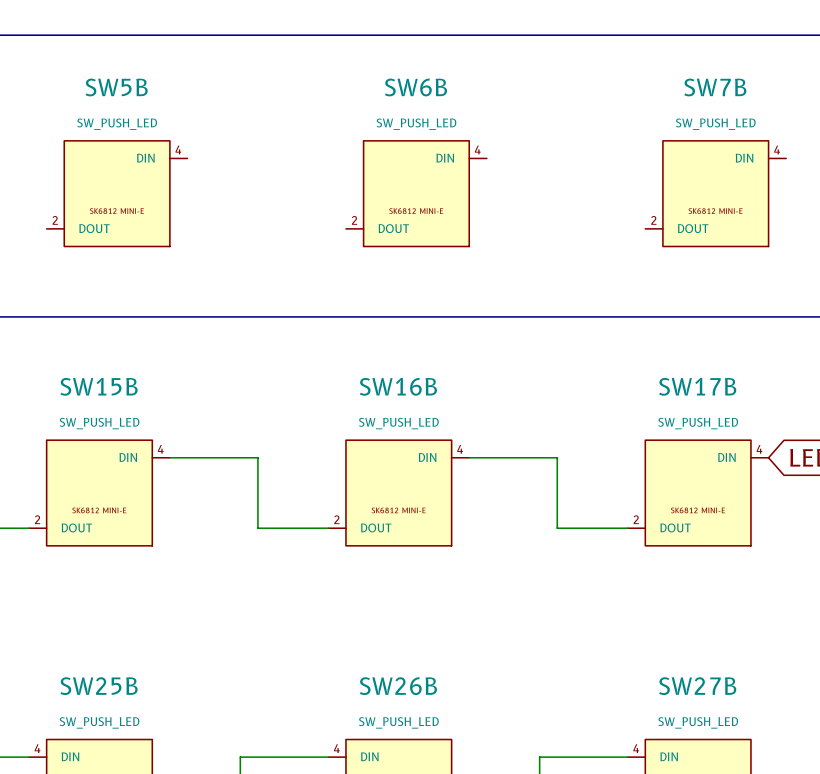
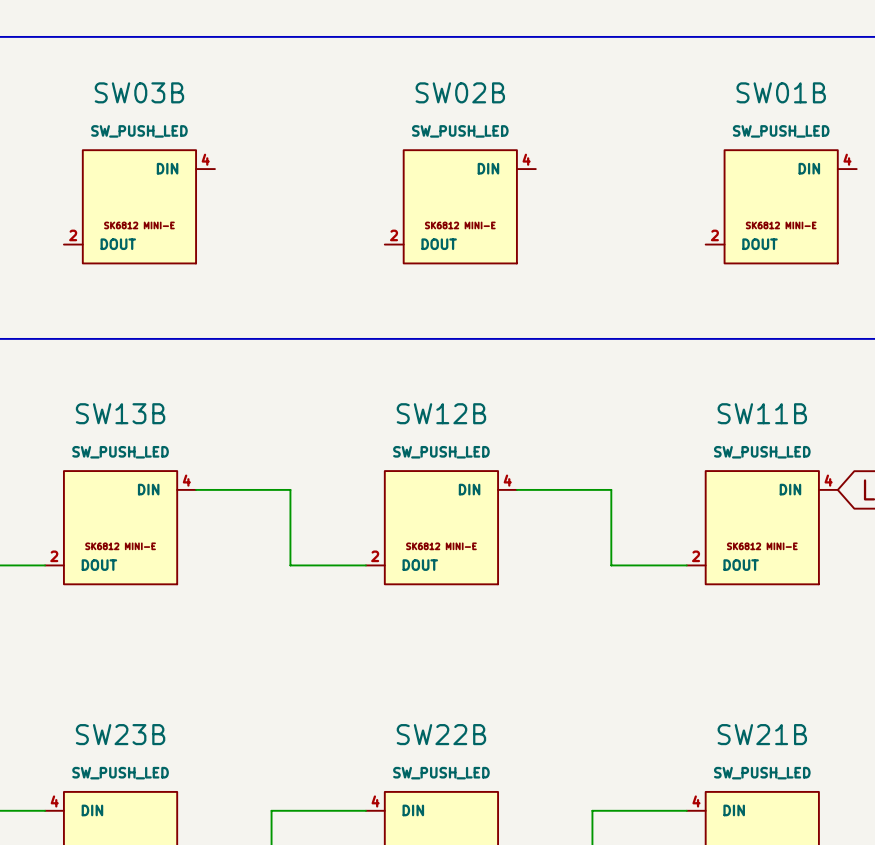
SW5B name: SW5B (116, 87) -> SW03B (139, 92)
SW6B name: SW6B (415, 87) -> SW02B (460, 92)
SW7B name: SW7B (715, 87) -> SW01B (781, 92)
SW15B name: SW15B (99, 386) -> SW13B (120, 413)
SW16B name: SW16B (398, 386) -> SW12B (441, 413)
SW17B name: SW17B (697, 386) -> SW11B (762, 413)
SW25B name: SW25B (99, 686) -> SW23B (120, 734)
SW26B name: SW26B (398, 686) -> SW22B (441, 734)
SW27B name: SW27B (697, 686) -> SW21B (762, 734)

